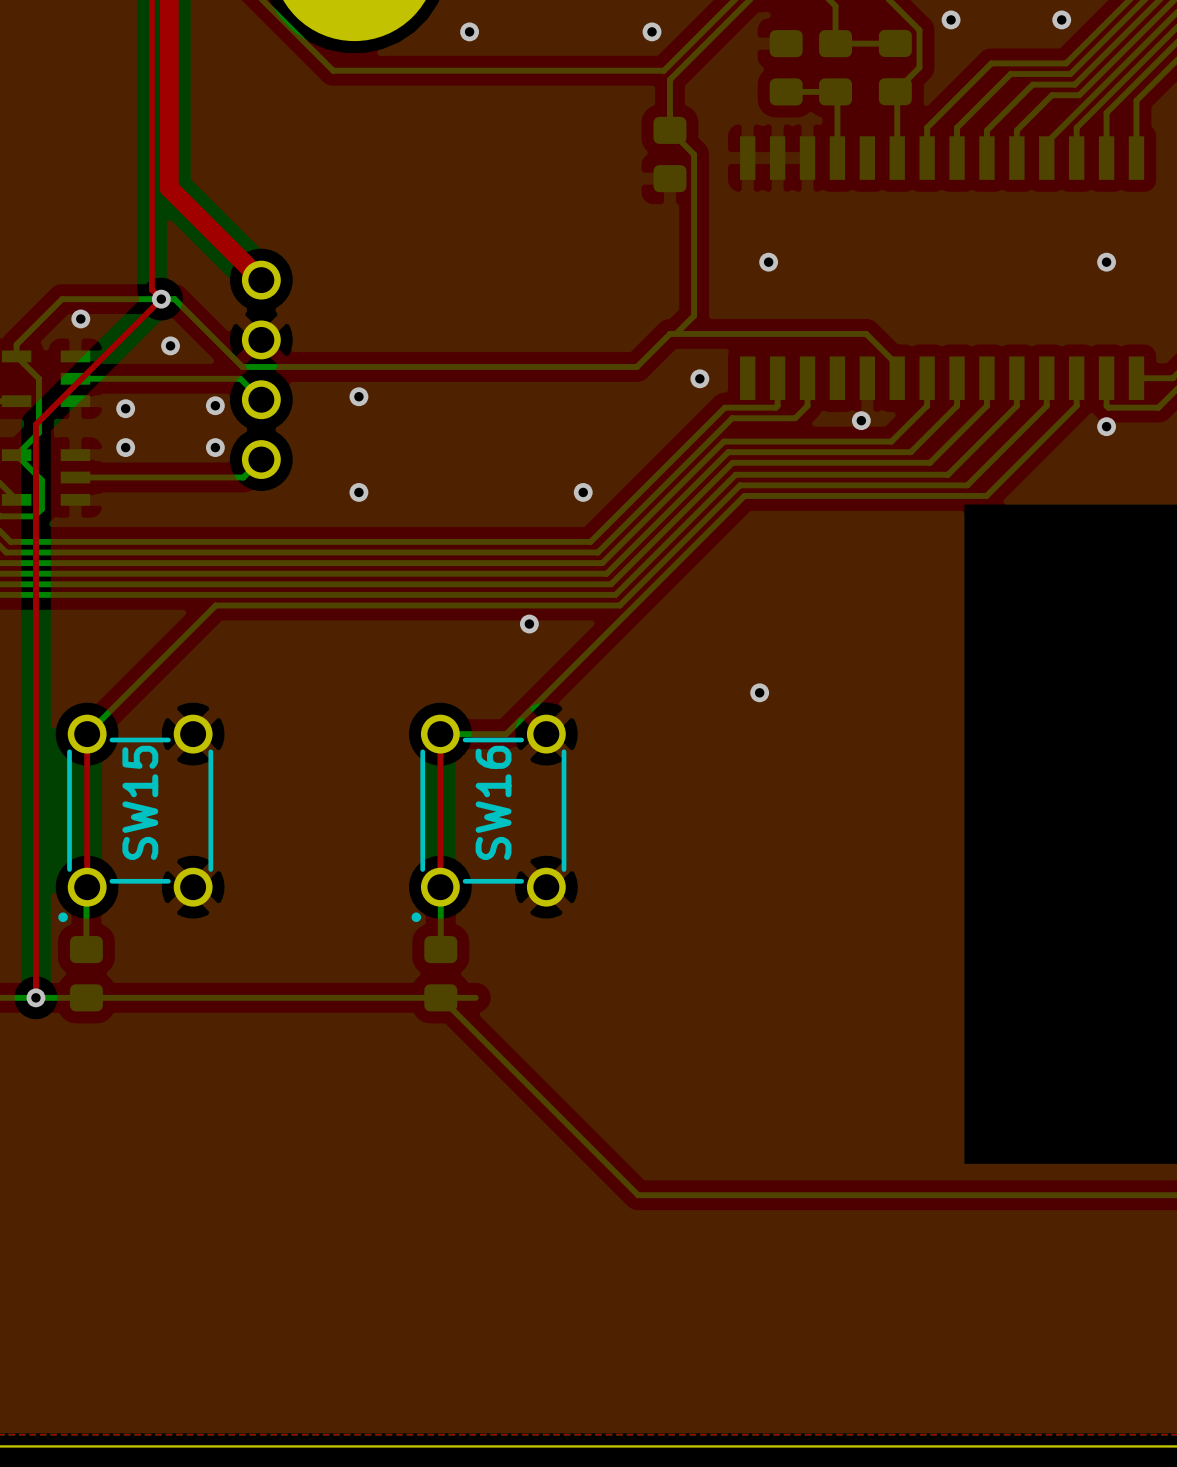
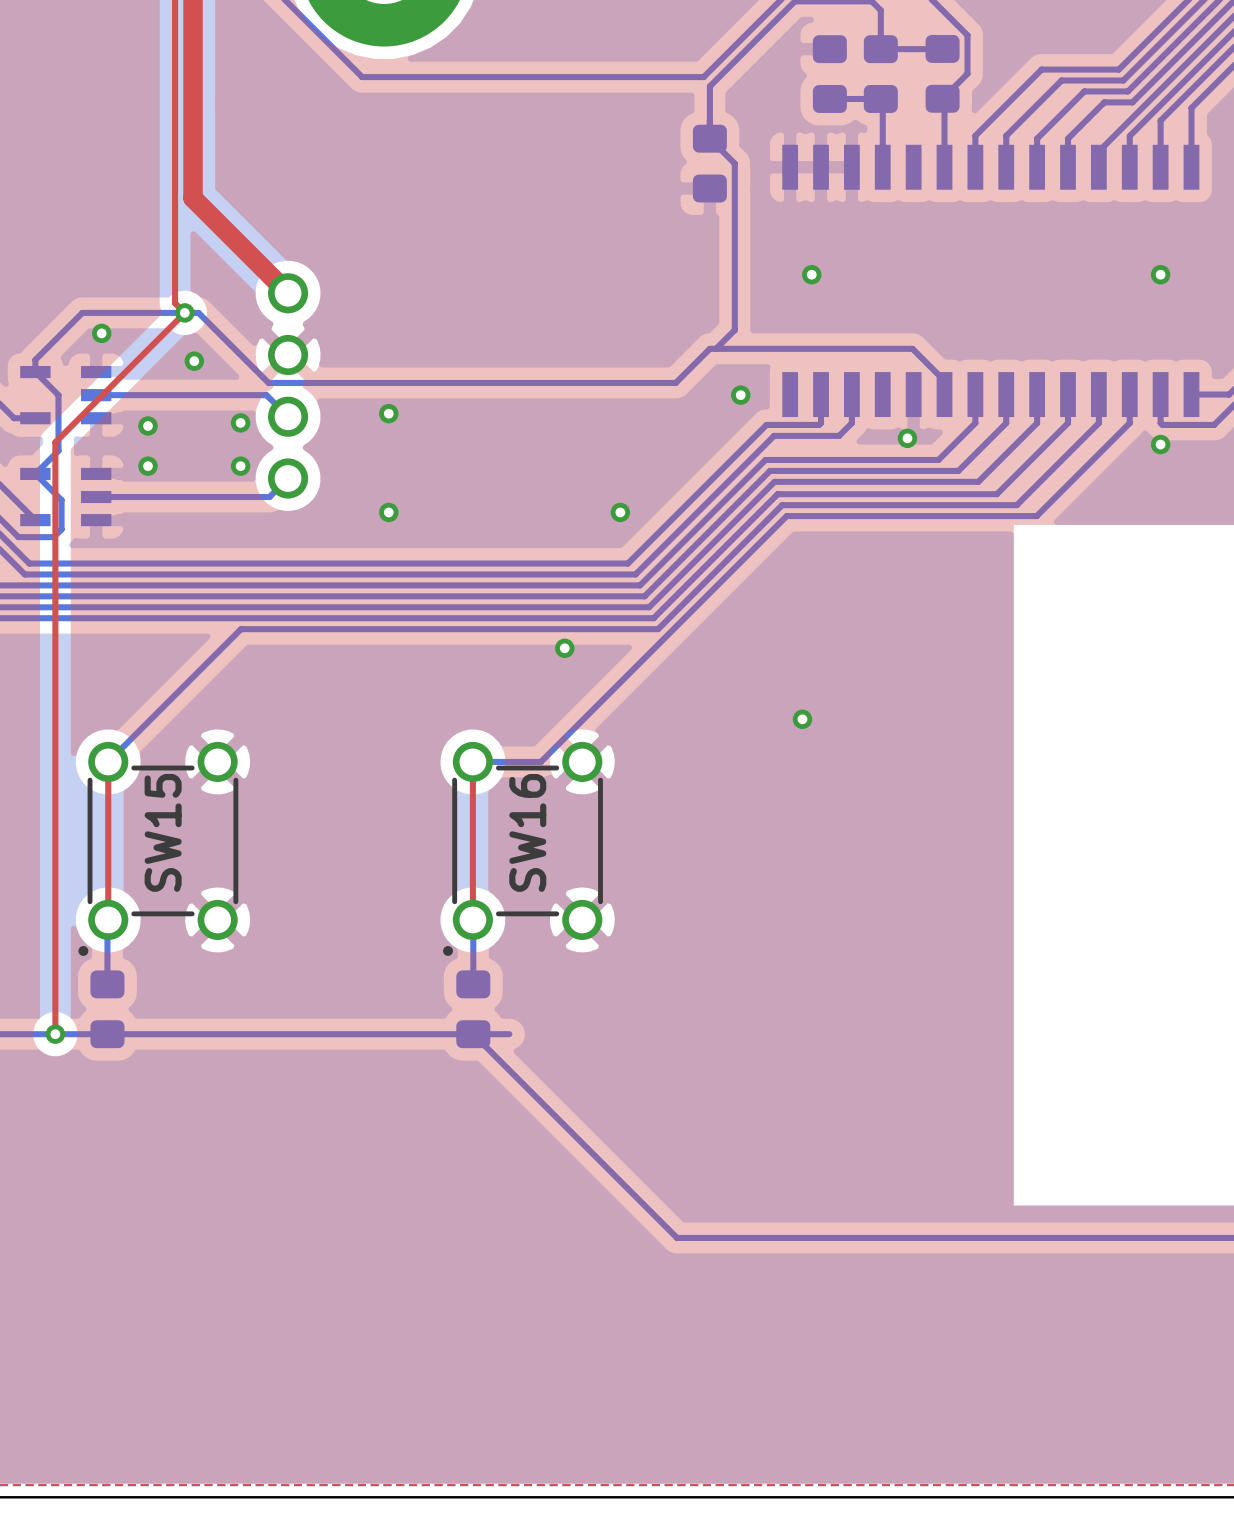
via: (951, 19) -> none
via: (1061, 19) -> none
via: (469, 31) -> none
via: (652, 31) -> none

